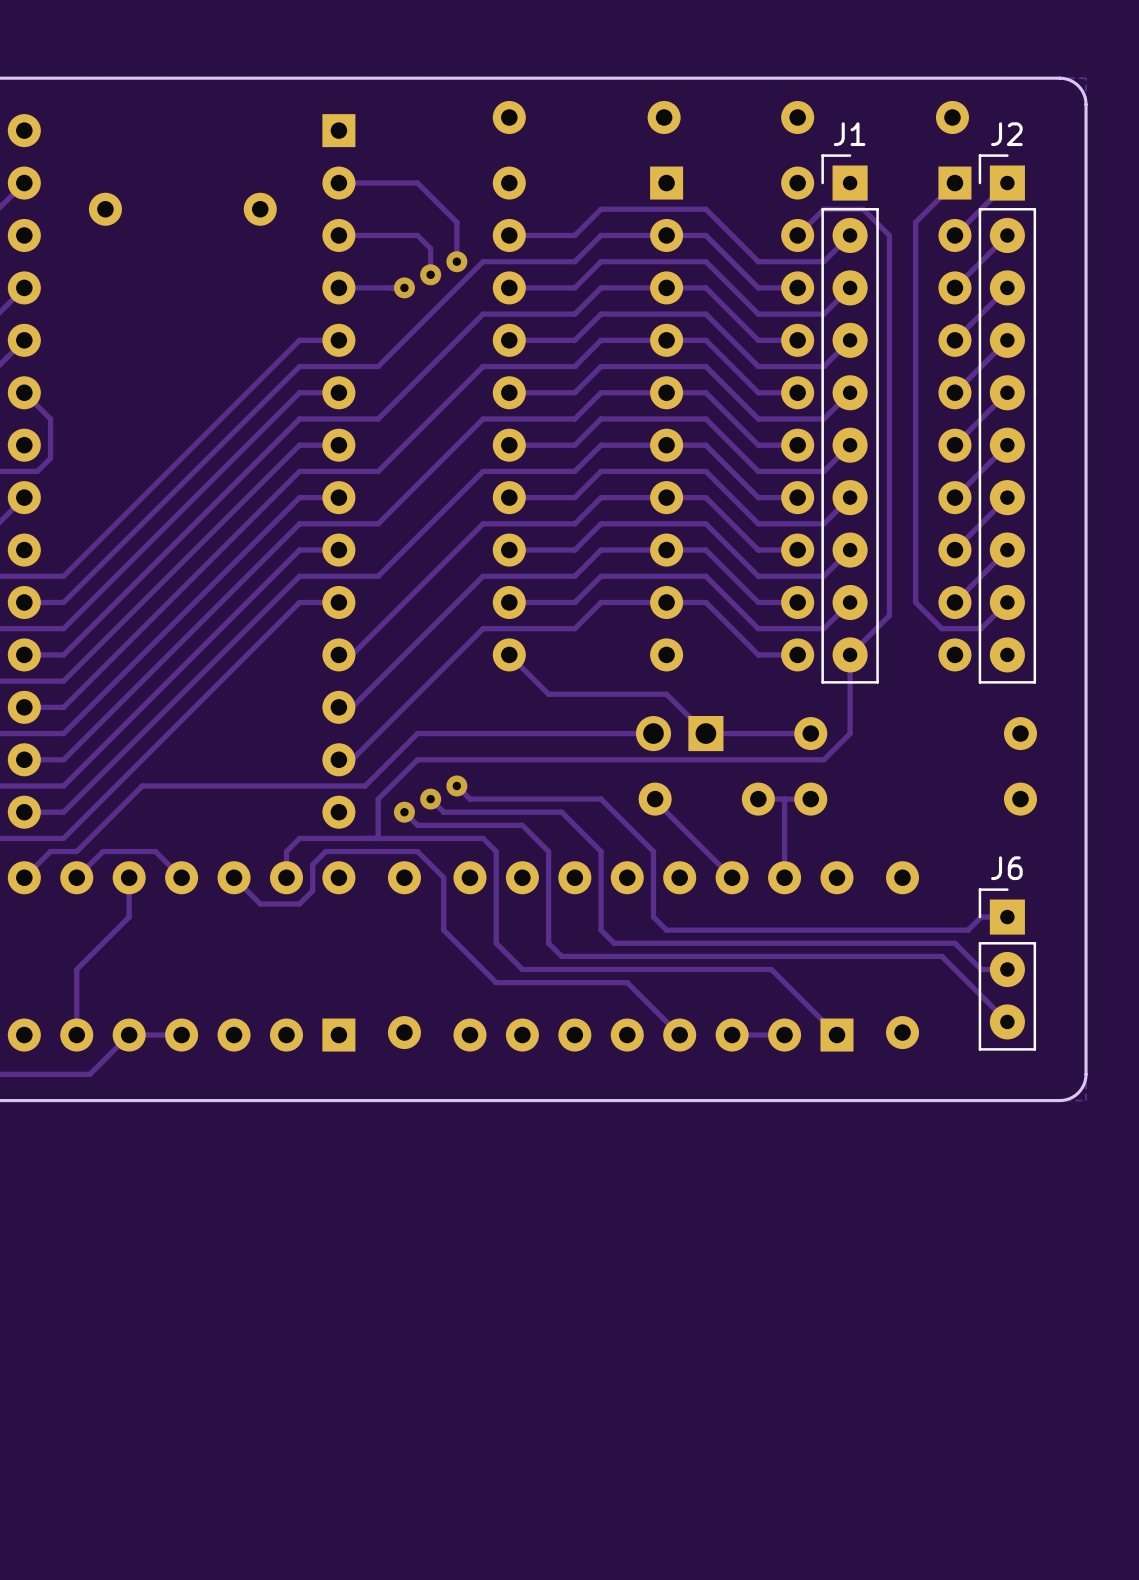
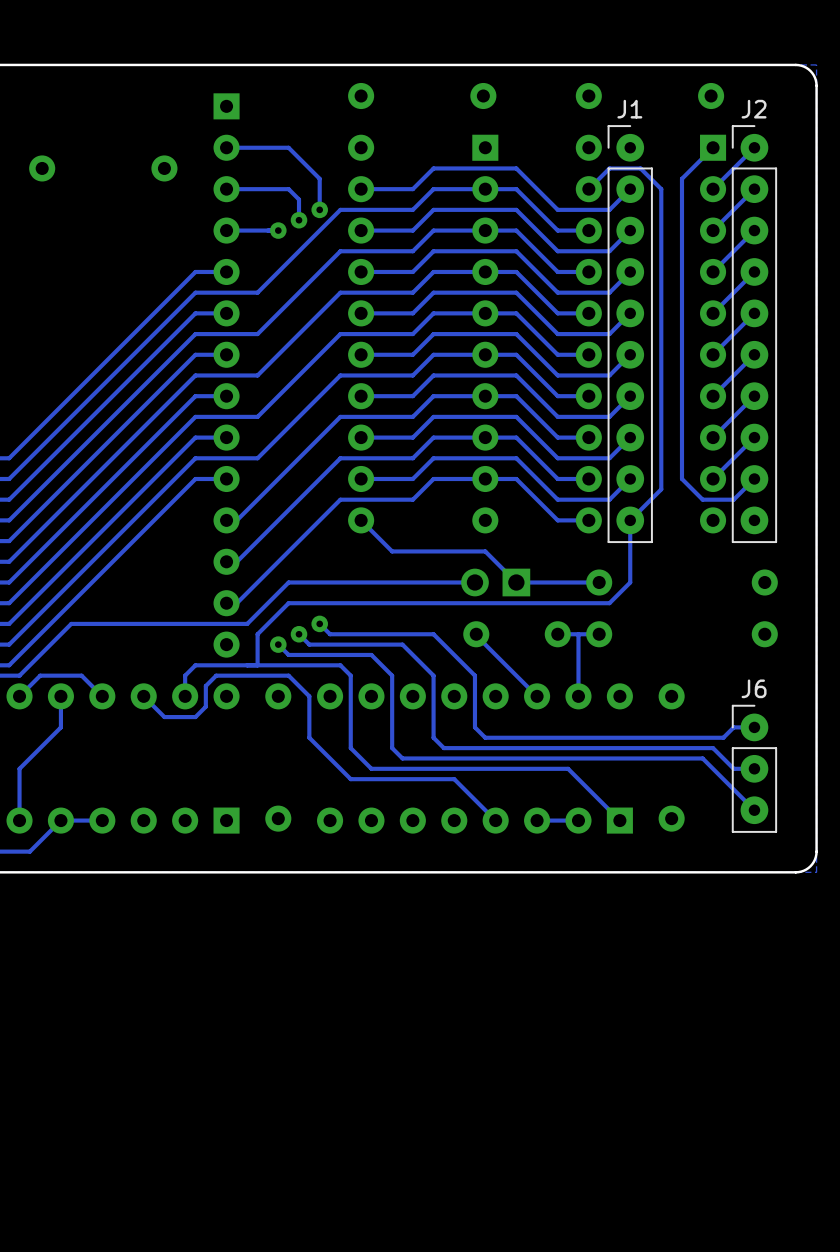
J1 footprint: [821, 154, 879, 684] -> [607, 125, 653, 544]
J2 footprint: [978, 154, 1037, 684] -> [731, 125, 778, 544]
J6 footprint: [978, 888, 1037, 1051] -> [731, 704, 778, 833]

